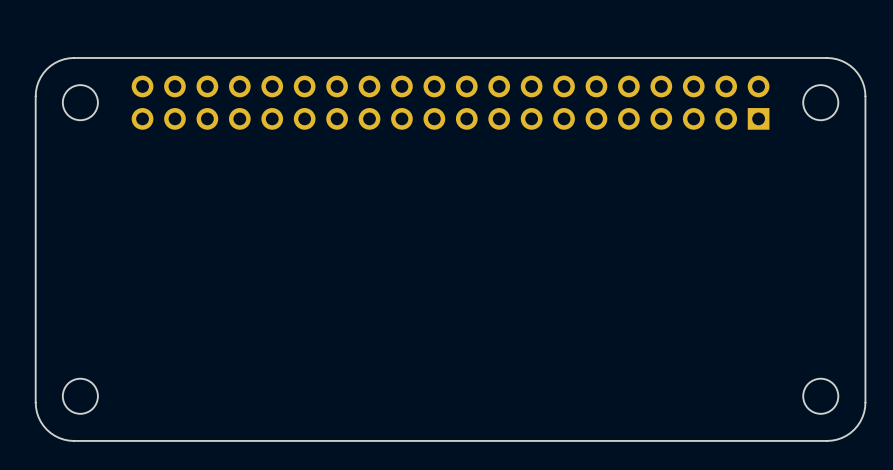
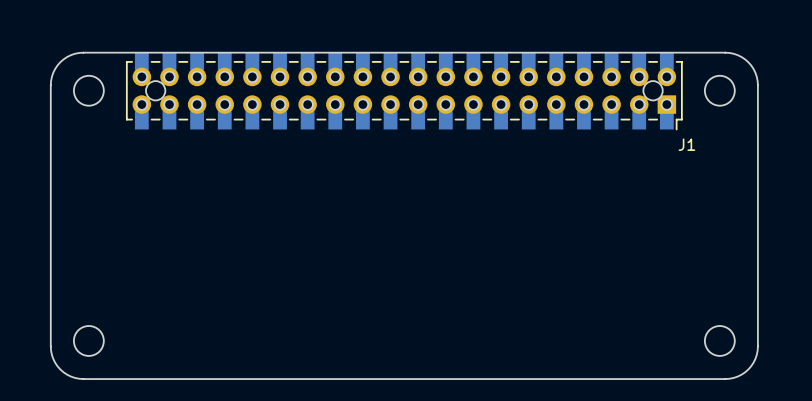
J1: none -> (404, 91)

